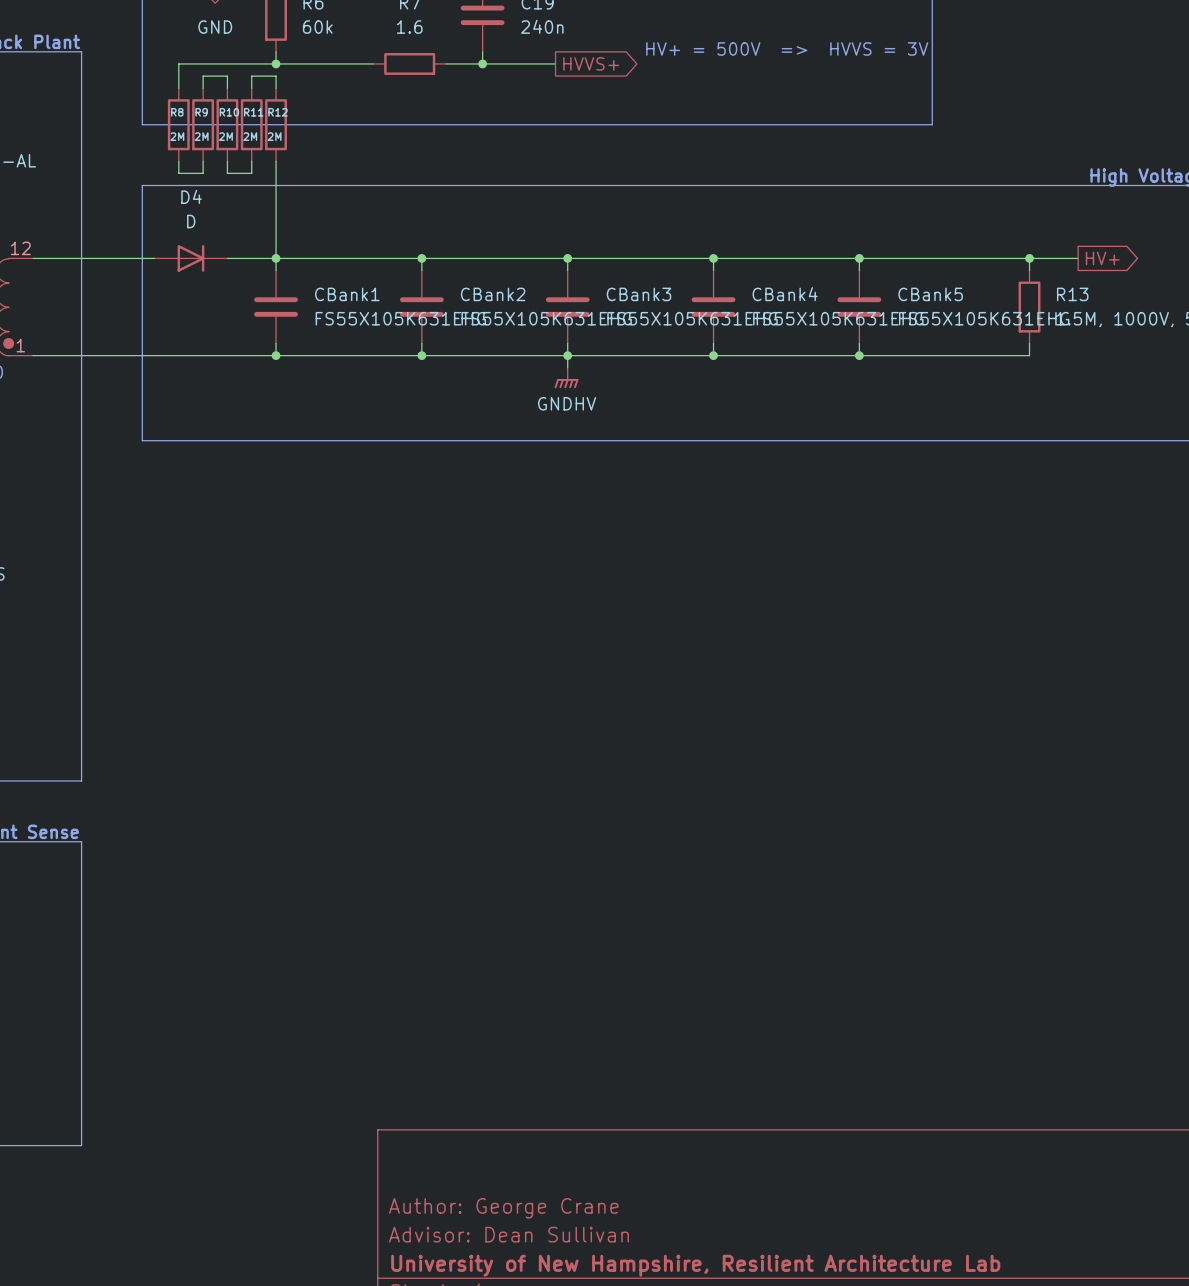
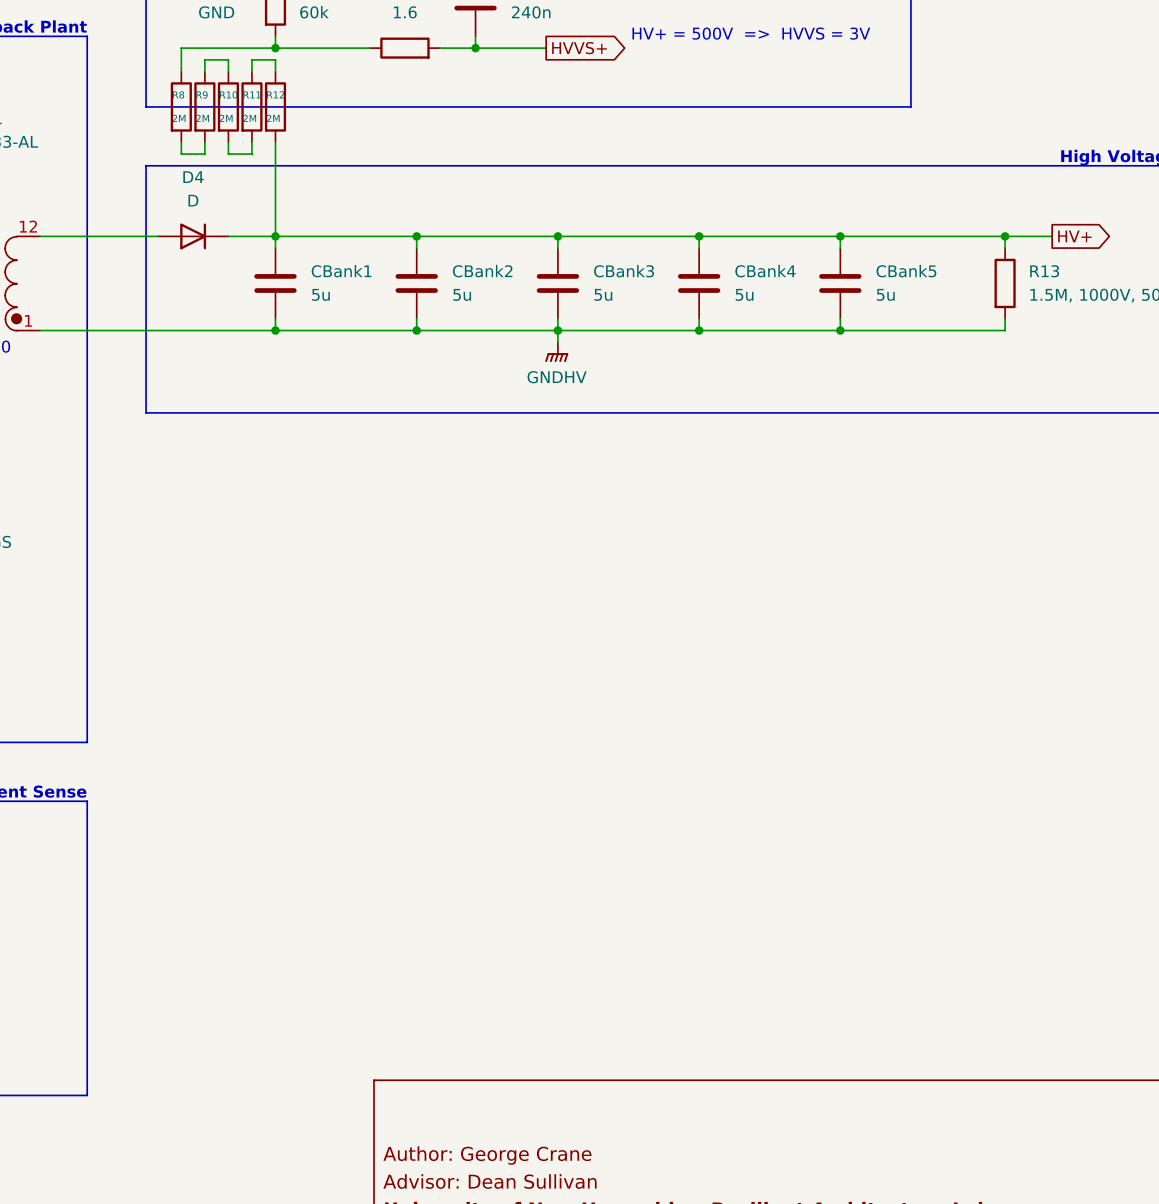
CBank1 value: FS55X105K631EHG (400, 318) -> 5u (320, 294)
CBank2 value: FS55X105K631EHG (546, 318) -> 5u (462, 294)
CBank3 value: FS55X105K631EHG (692, 318) -> 5u (603, 294)
CBank4 value: FS55X105K631EHG (838, 318) -> 5u (744, 294)
CBank5 value: FS55X105K631EHG (984, 318) -> 5u (885, 294)

